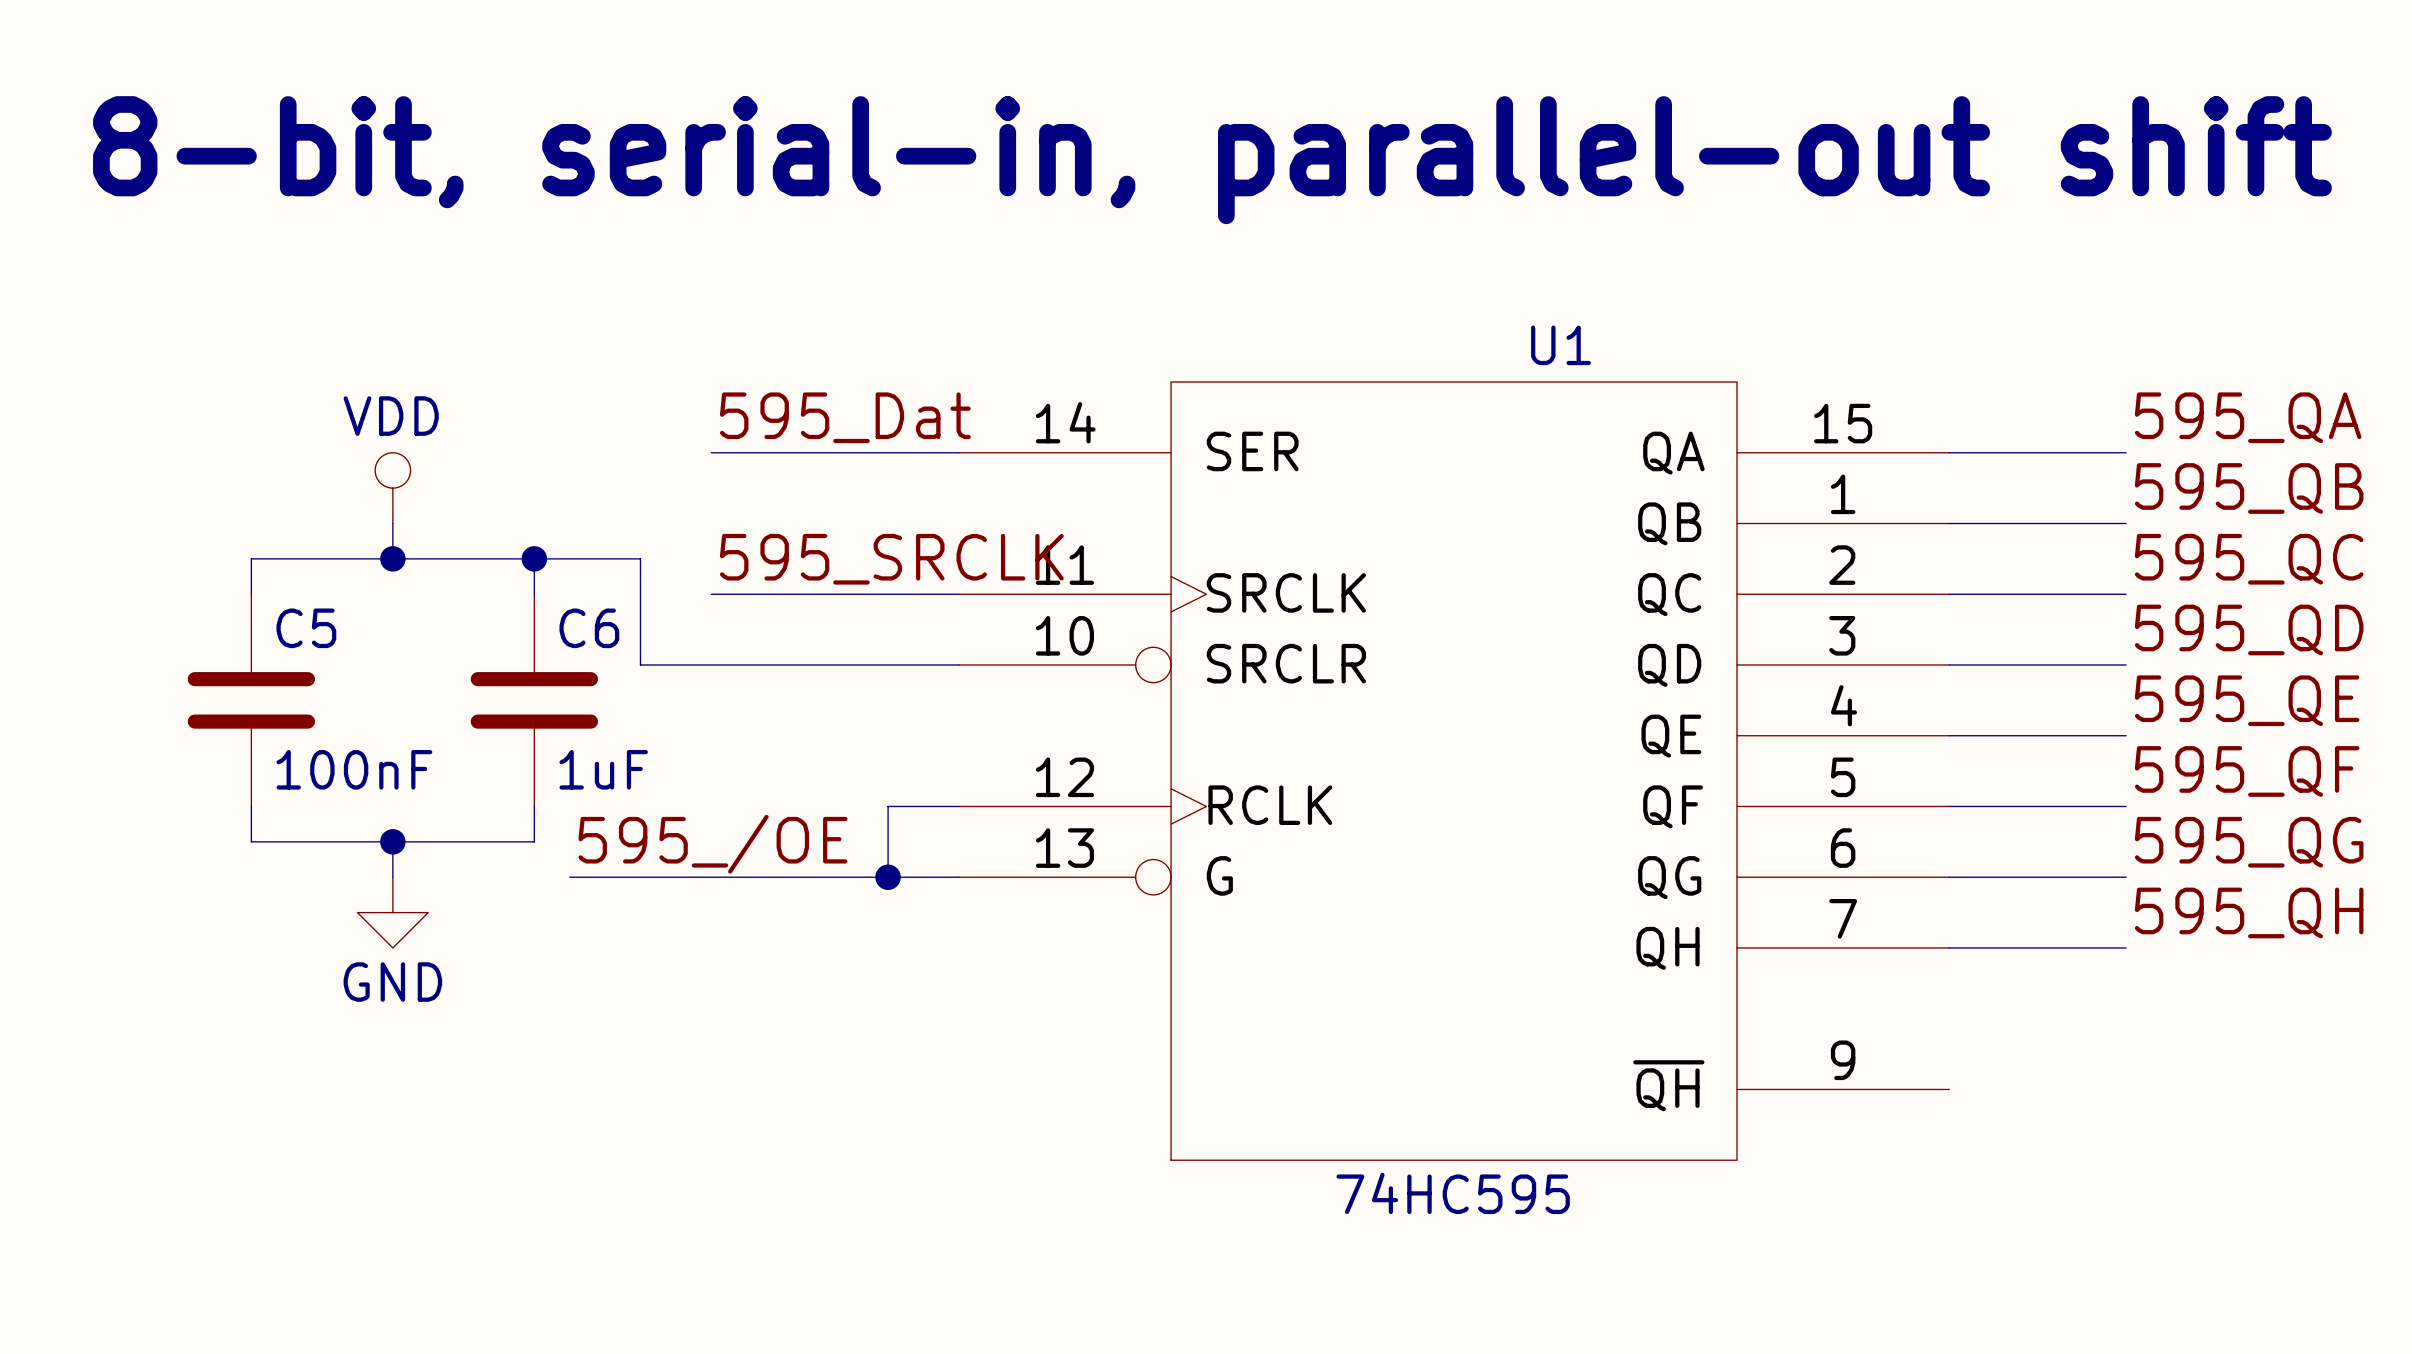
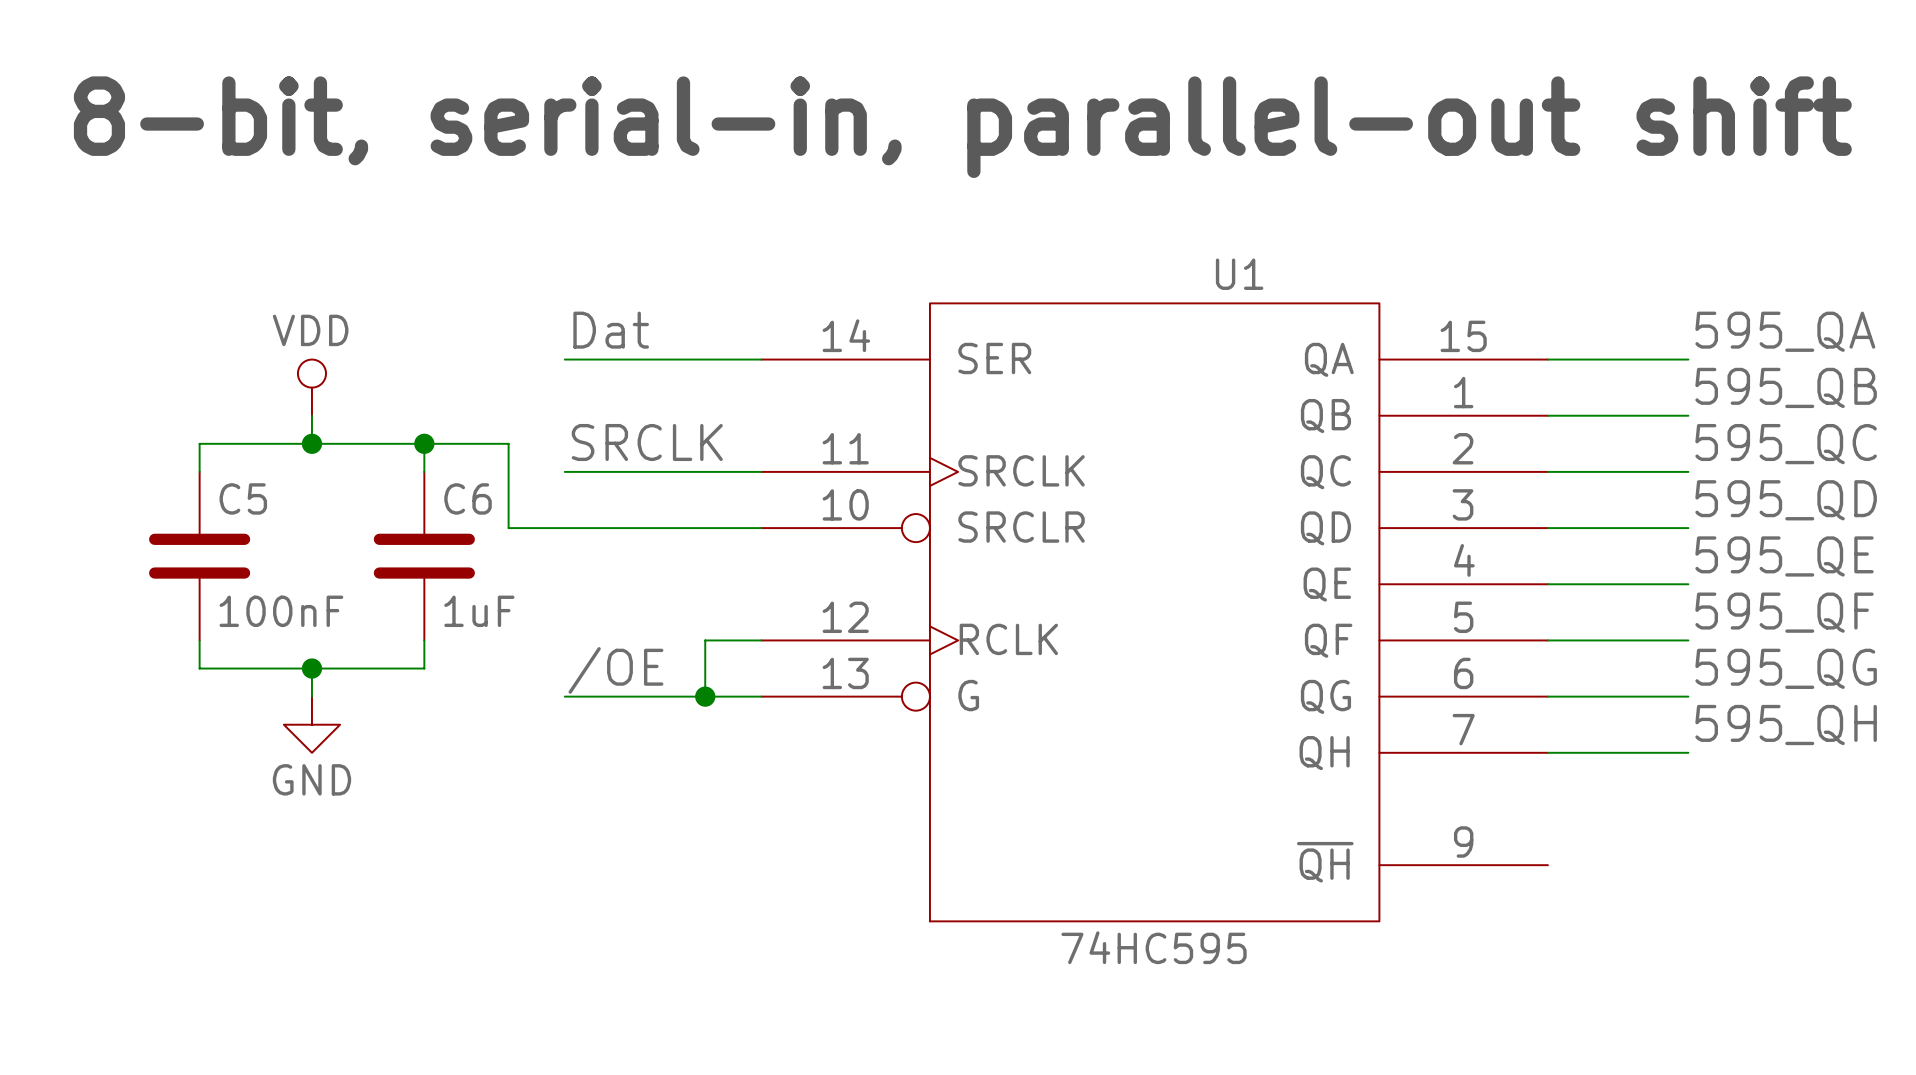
label: 595_Dat (845, 417) -> Dat (611, 330)
label: 595_SRCLK (891, 559) -> SRCLK (647, 442)
label: 595_/OE (712, 844) -> none
label: none -> /OE (615, 670)
wire: (569, 877) (711, 877) -> none

